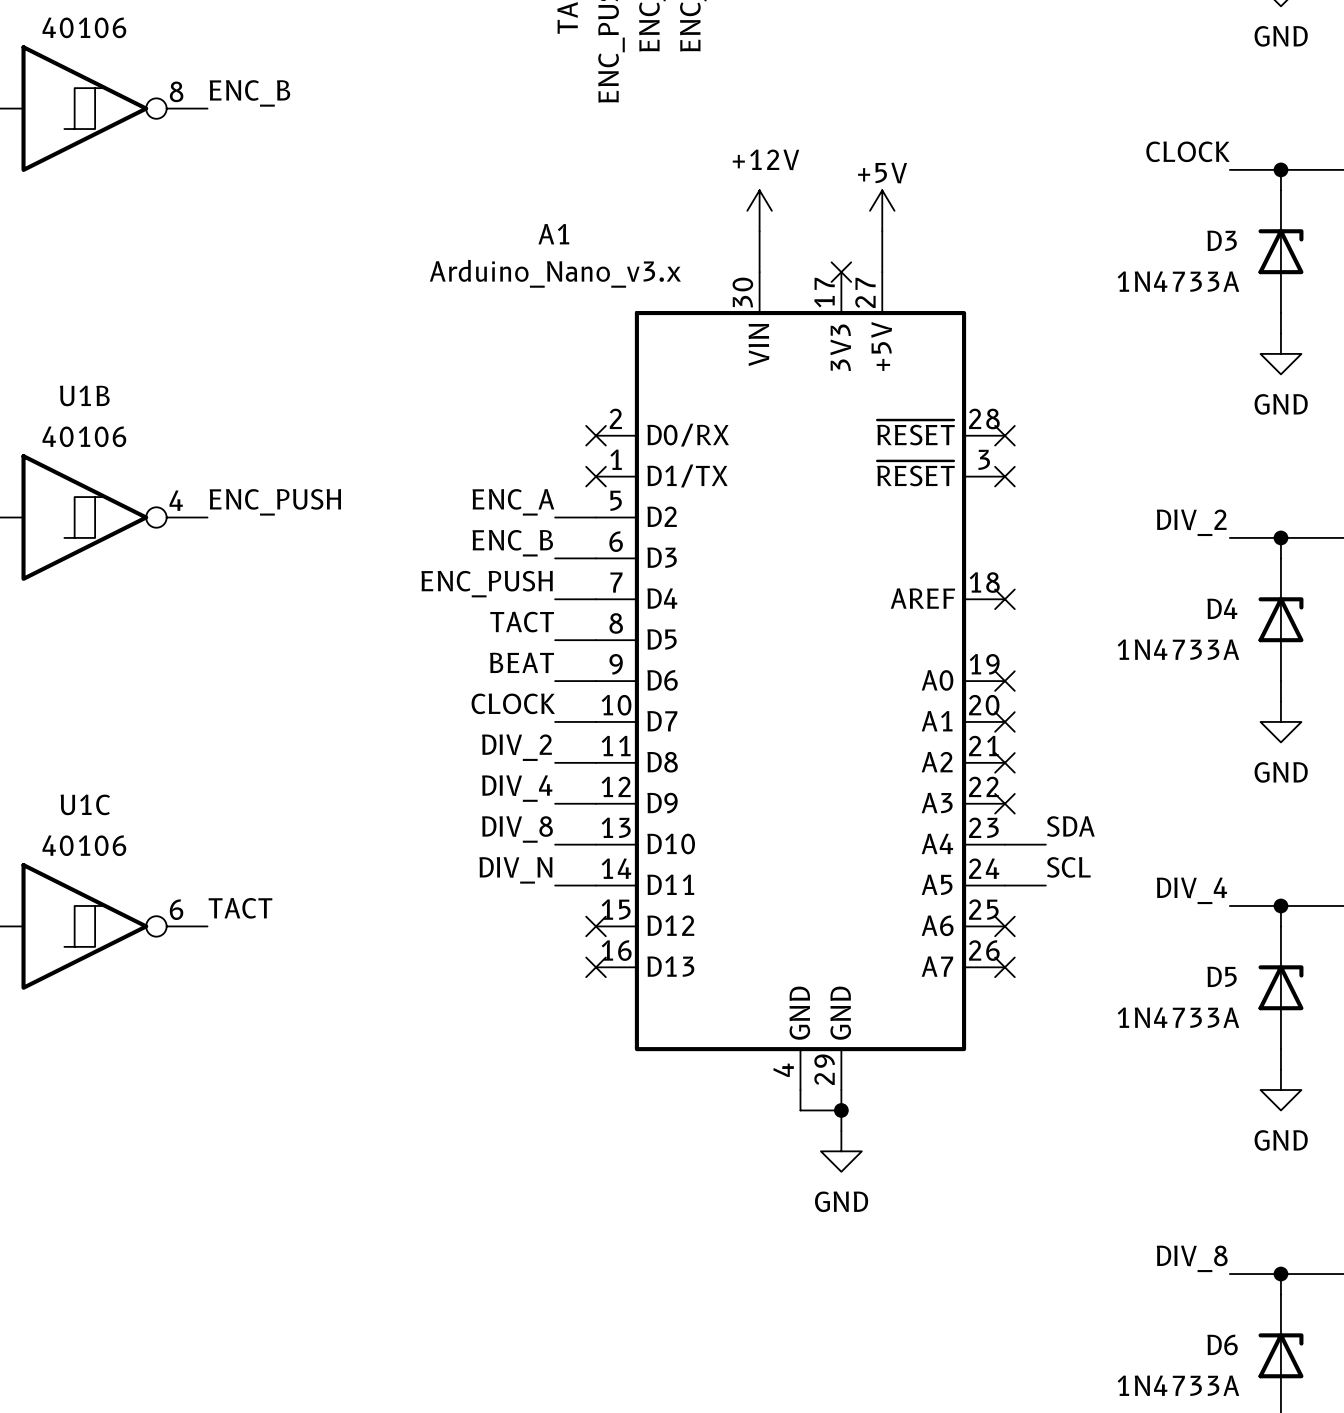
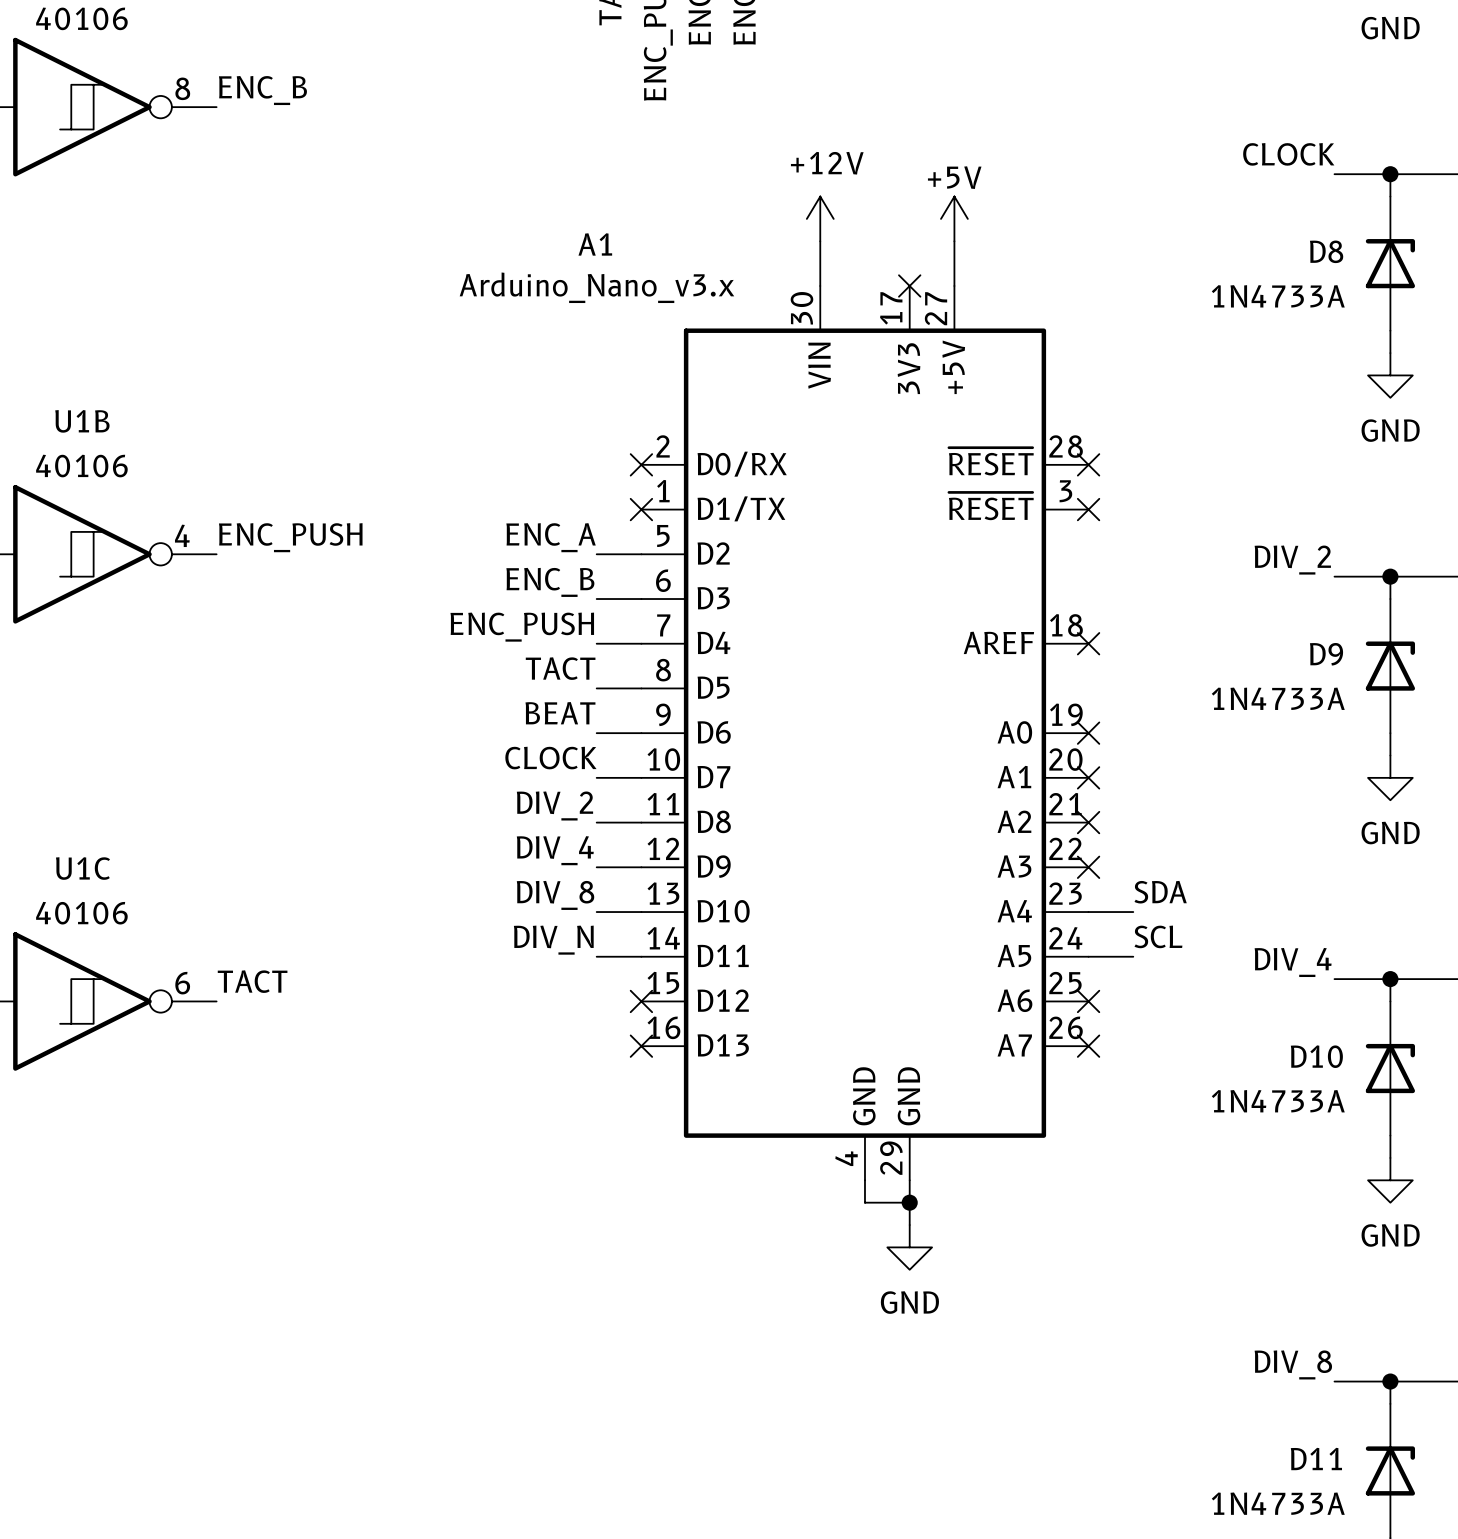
D3 name: D3 (1222, 240) -> D8 (1326, 251)
D4 name: D4 (1222, 608) -> D9 (1326, 654)
D5 name: D5 (1222, 976) -> D10 (1316, 1056)
D6 name: D6 (1222, 1345) -> D11 (1316, 1459)

